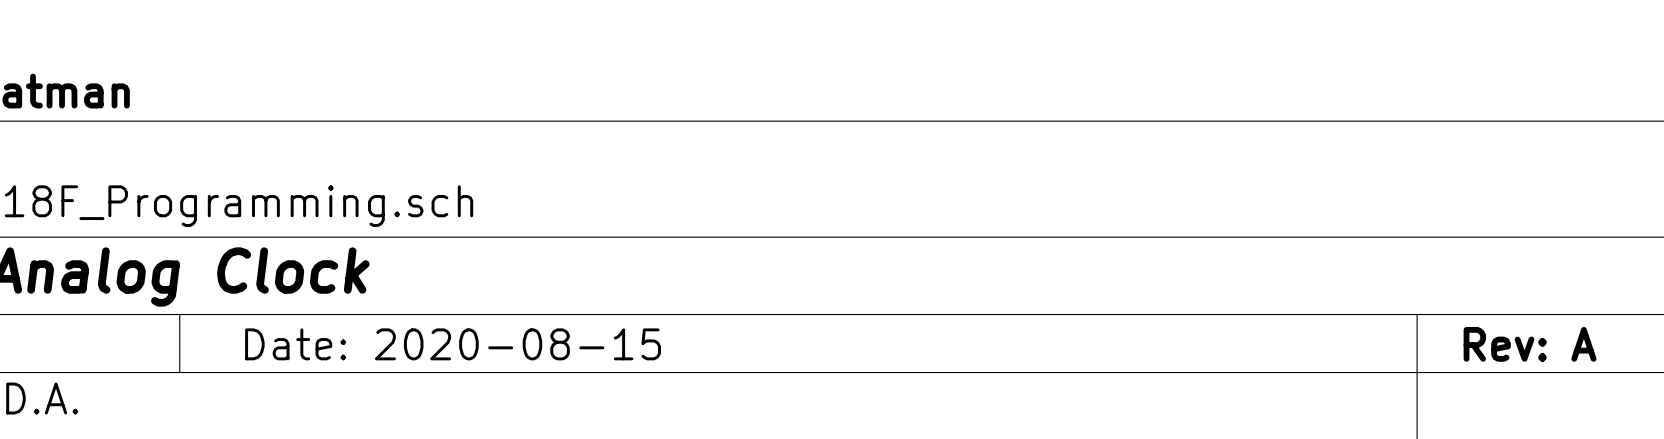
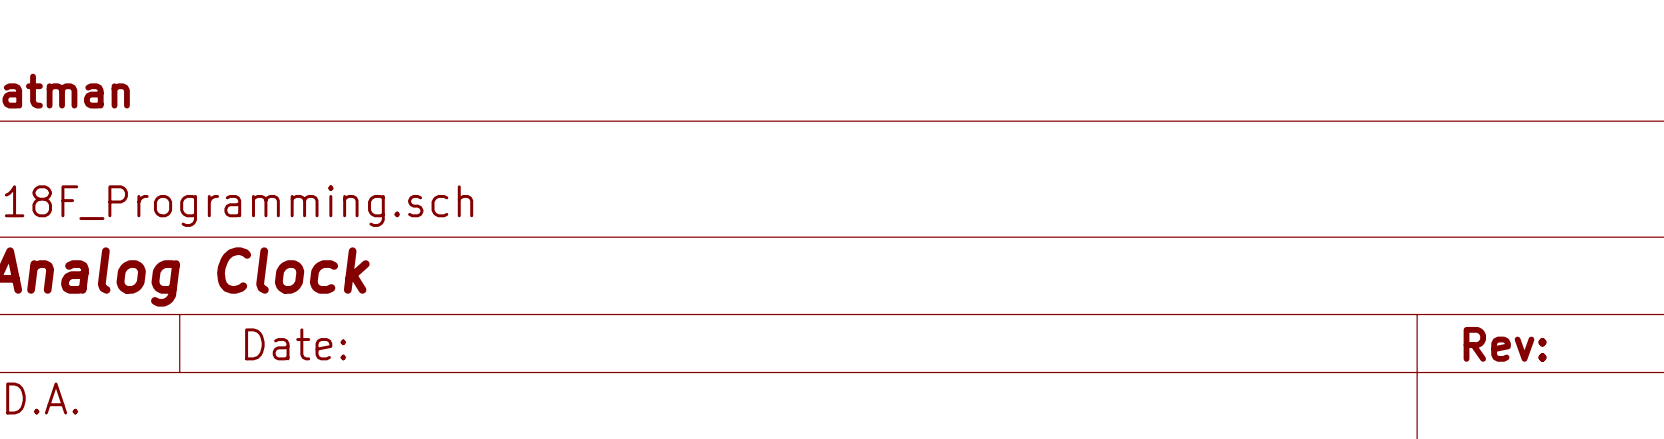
title block: Date: 2020-08-15 (453, 344) -> Date: (295, 344)
title block: Rev: A (1530, 344) -> Rev: (1505, 344)

